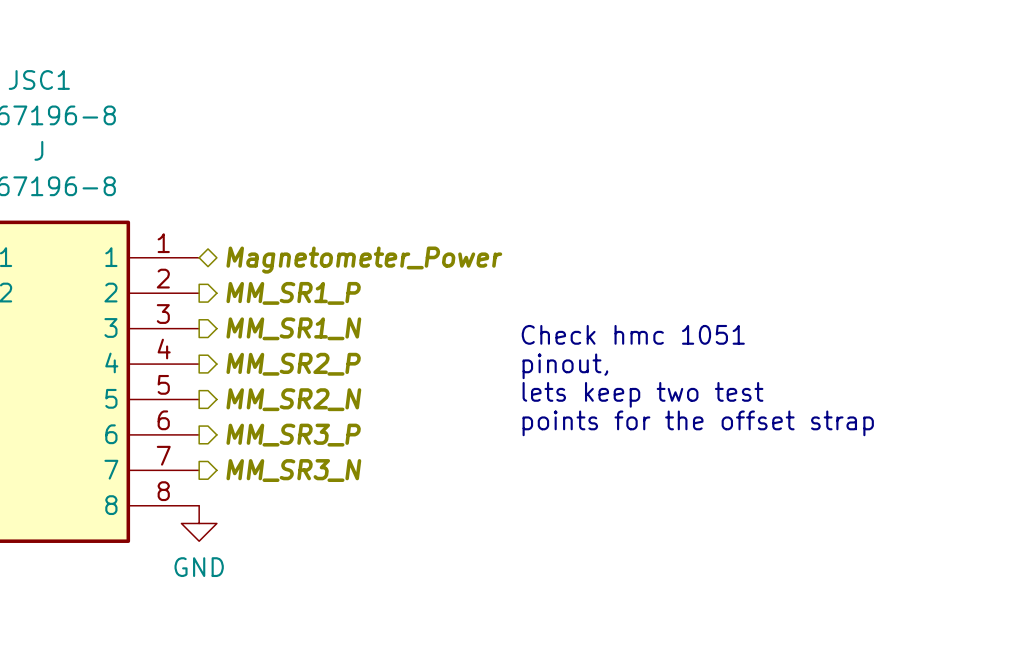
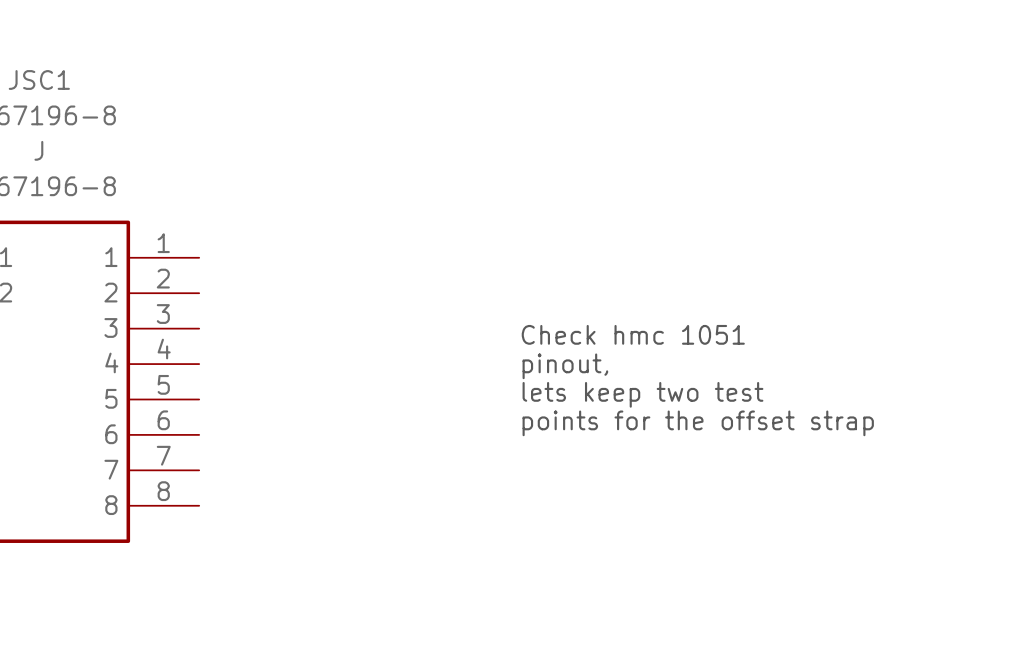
hierarchical label: Magnetometer_Power (364, 260) -> none
hierarchical label: MM_SR1_P (293, 293) -> none
hierarchical label: MM_SR1_N (293, 328) -> none
hierarchical label: MM_SR2_P (293, 364) -> none
hierarchical label: MM_SR2_N (293, 399) -> none
hierarchical label: MM_SR3_P (293, 435) -> none
hierarchical label: MM_SR3_N (293, 470) -> none
power symbol: GND (199, 523) -> none

